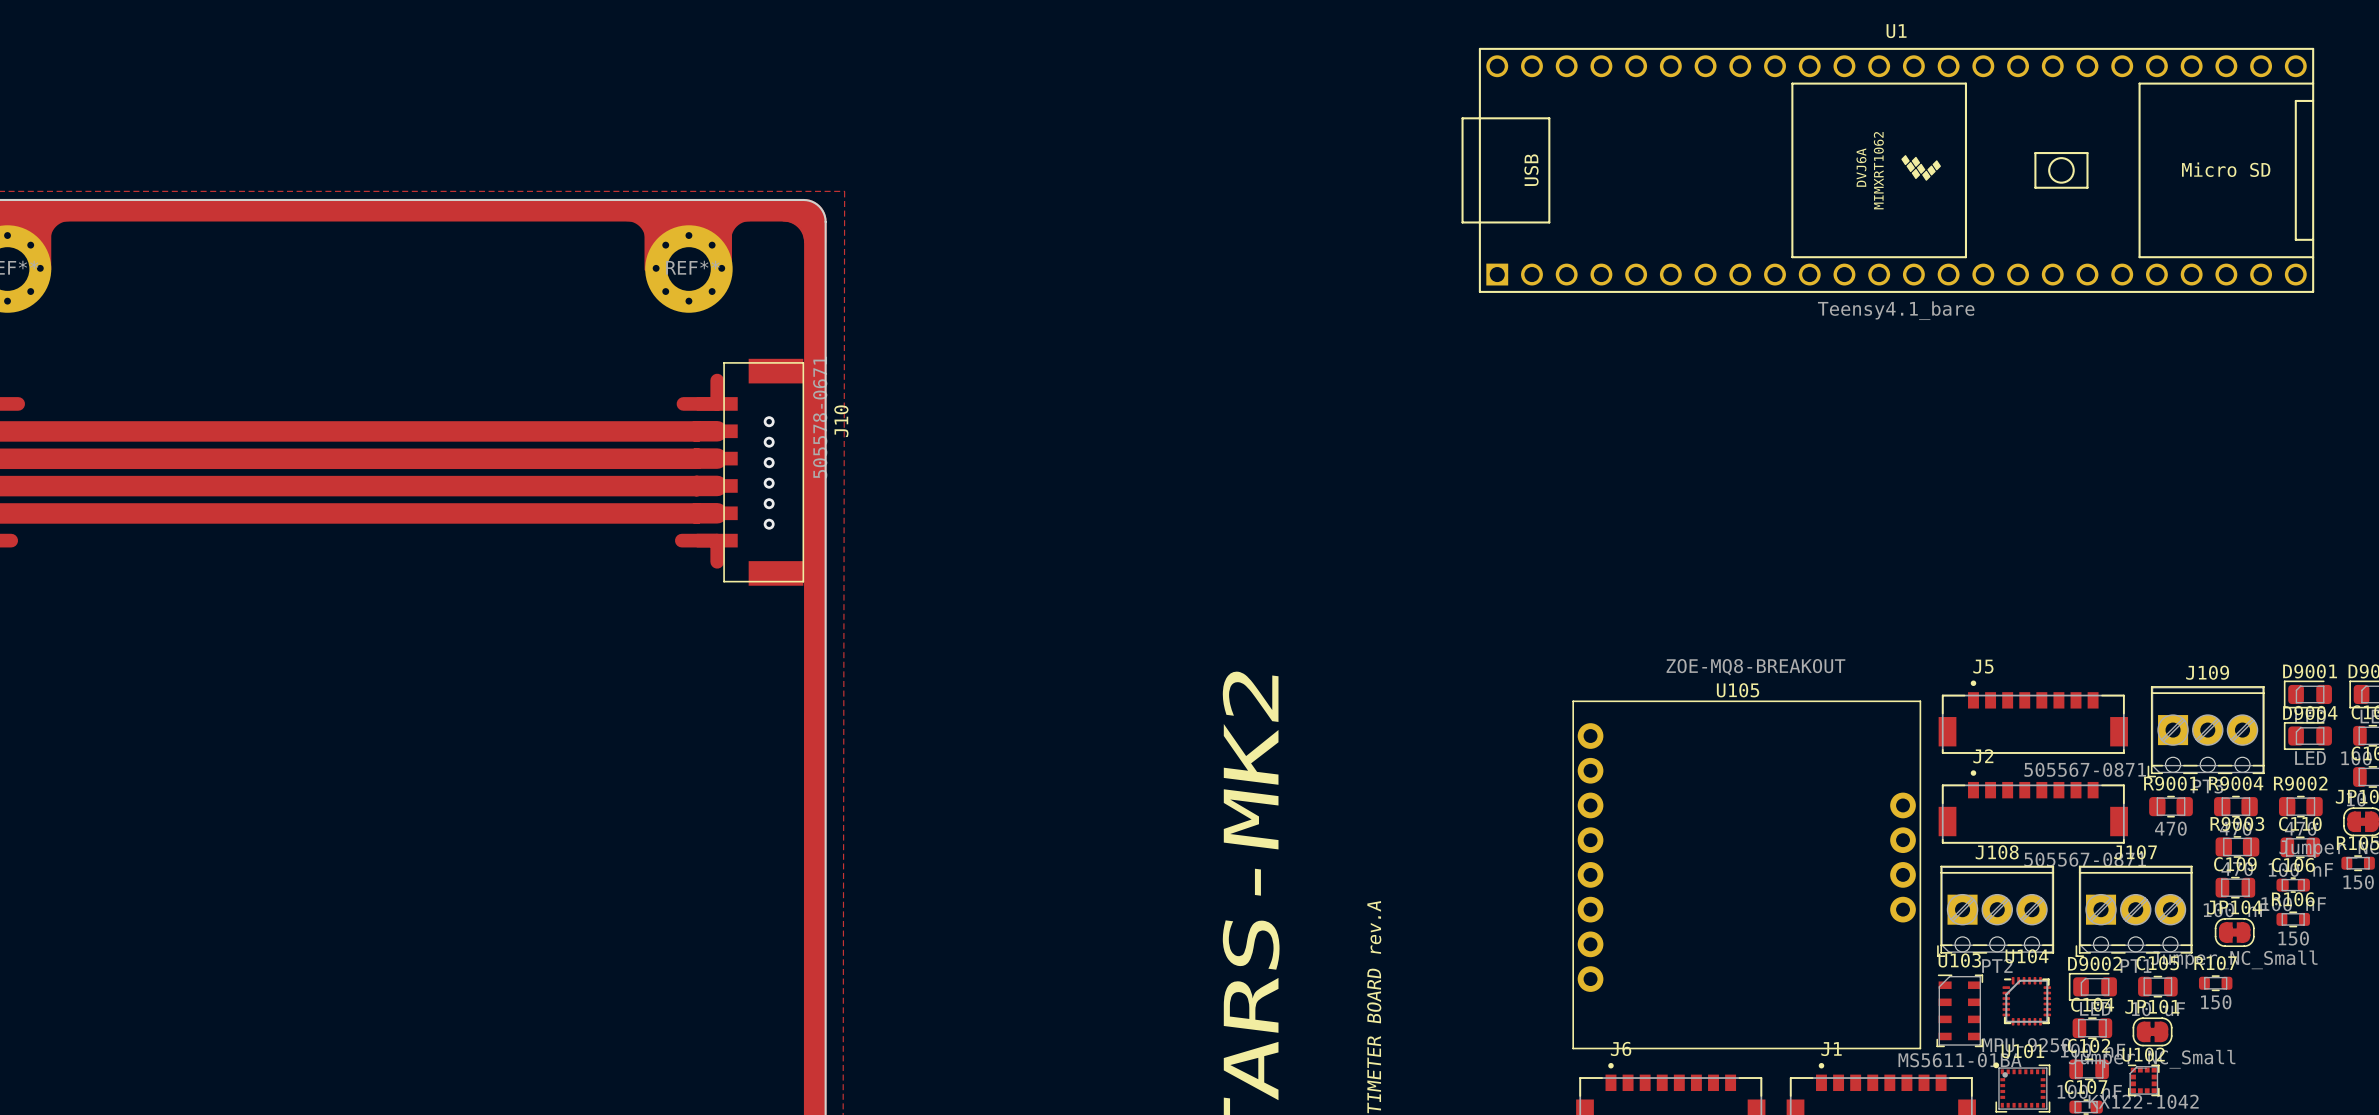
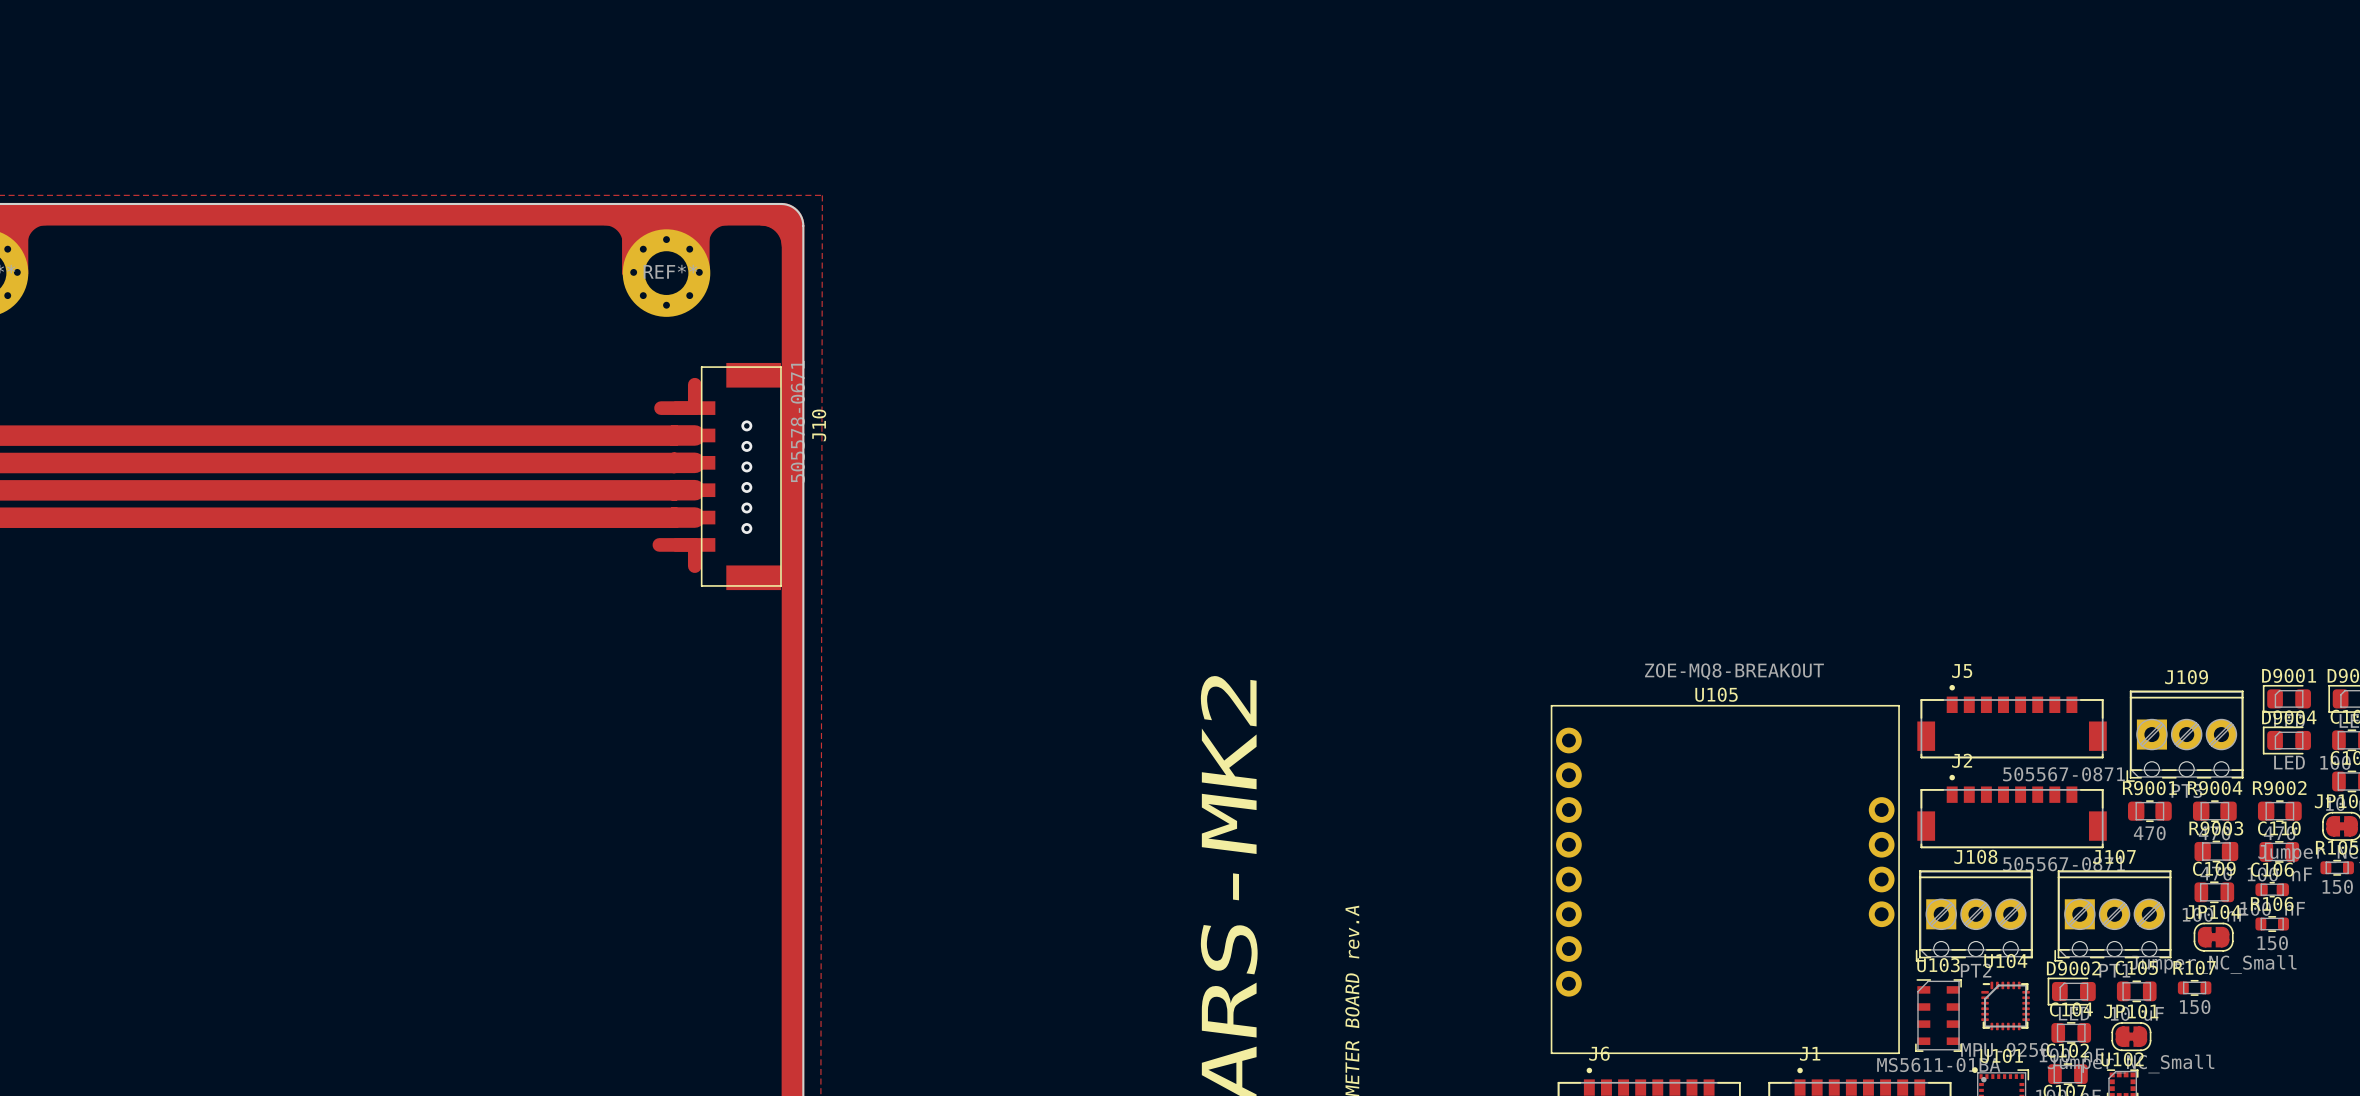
U1: Teensy4.1_bare (1887, 170) -> none

